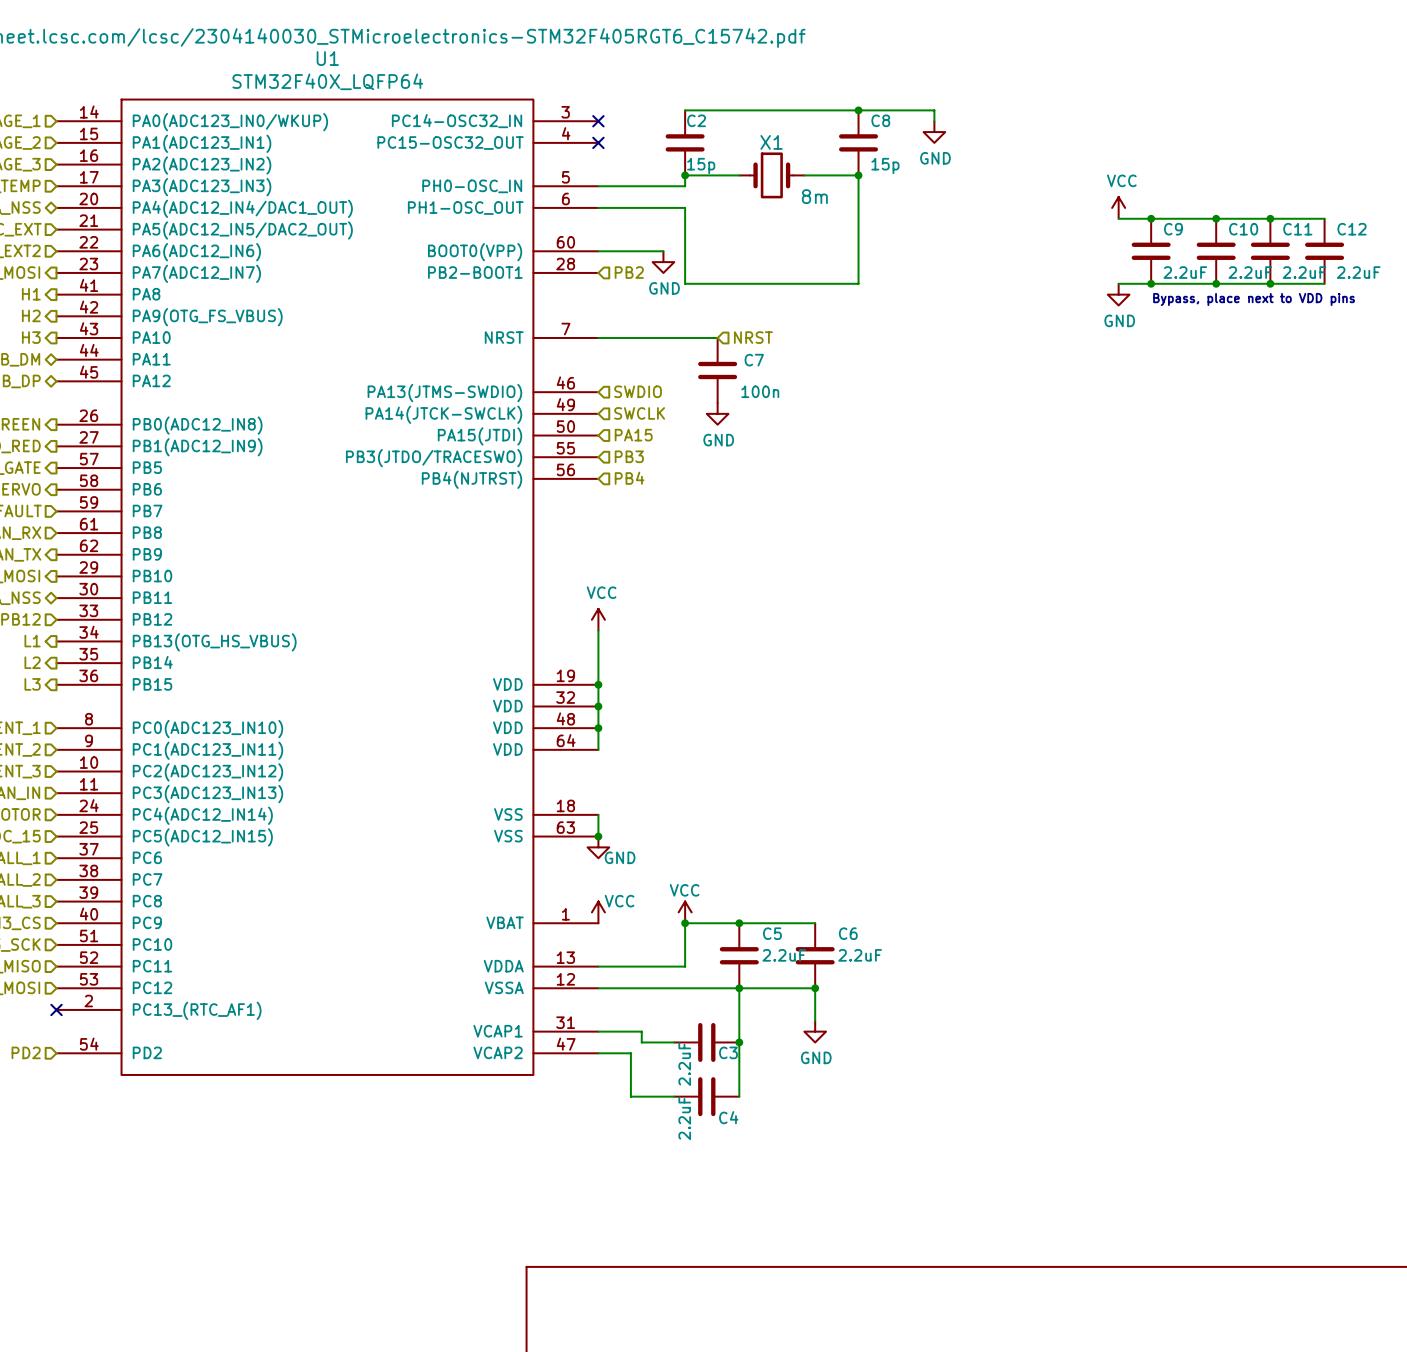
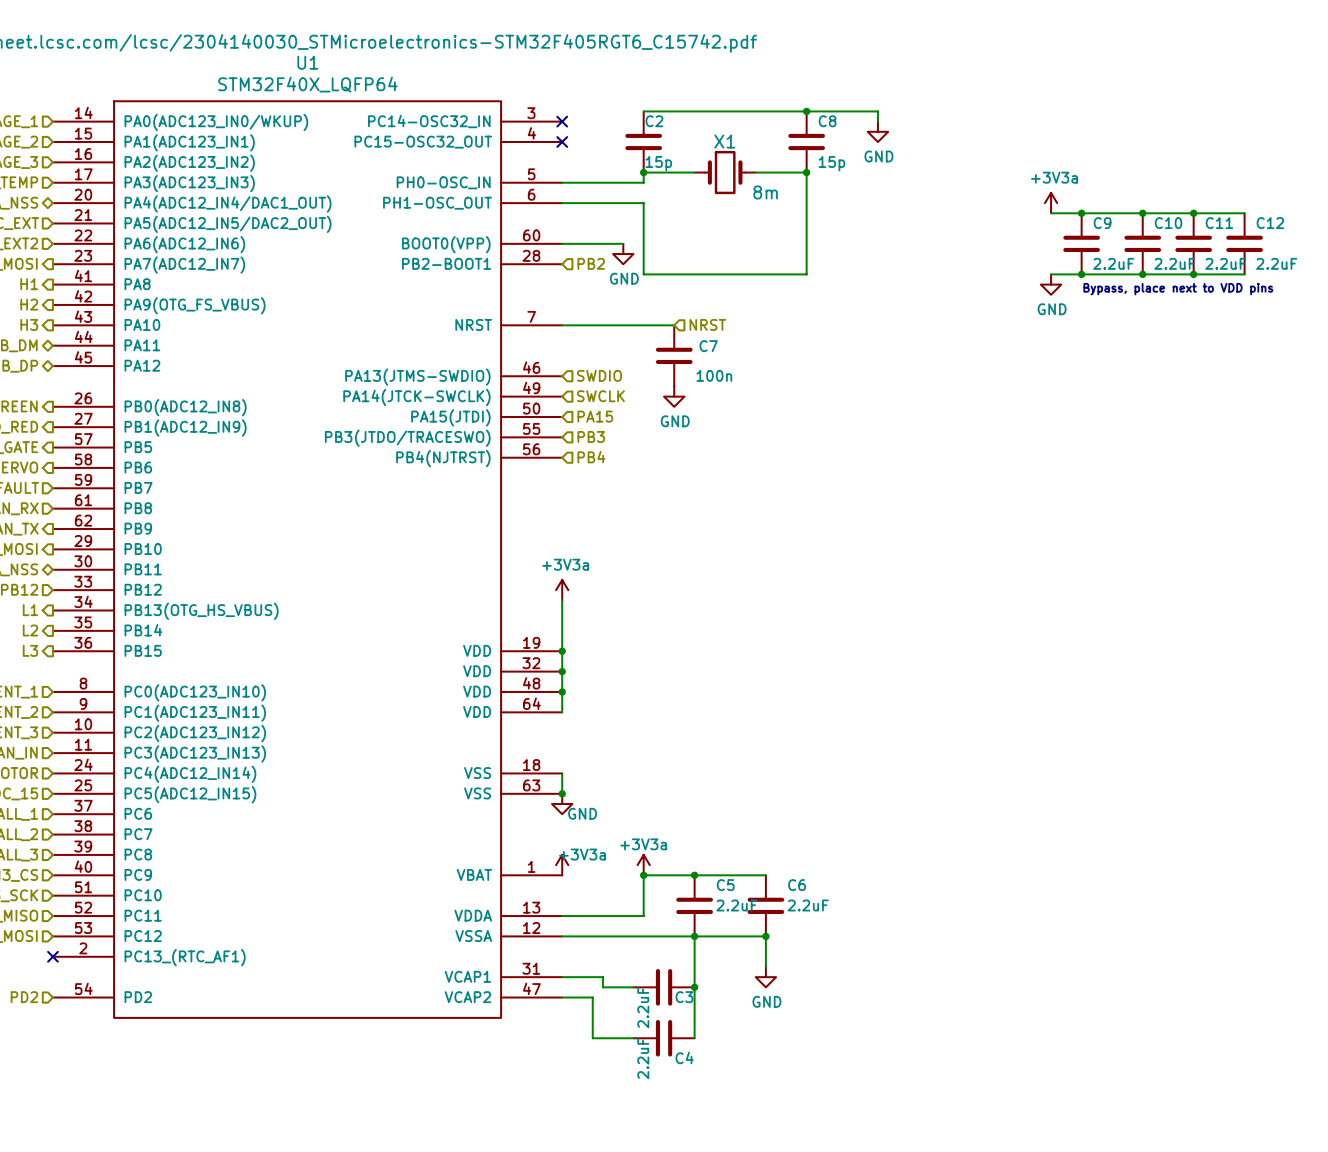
power symbol: VCC (1118, 207) -> +3V3a (1051, 203)
power symbol: VCC (598, 619) -> +3V3a (562, 590)
power symbol: VCC (598, 912) -> +3V3a (562, 865)
power symbol: VCC (685, 912) -> +3V3a (643, 865)

